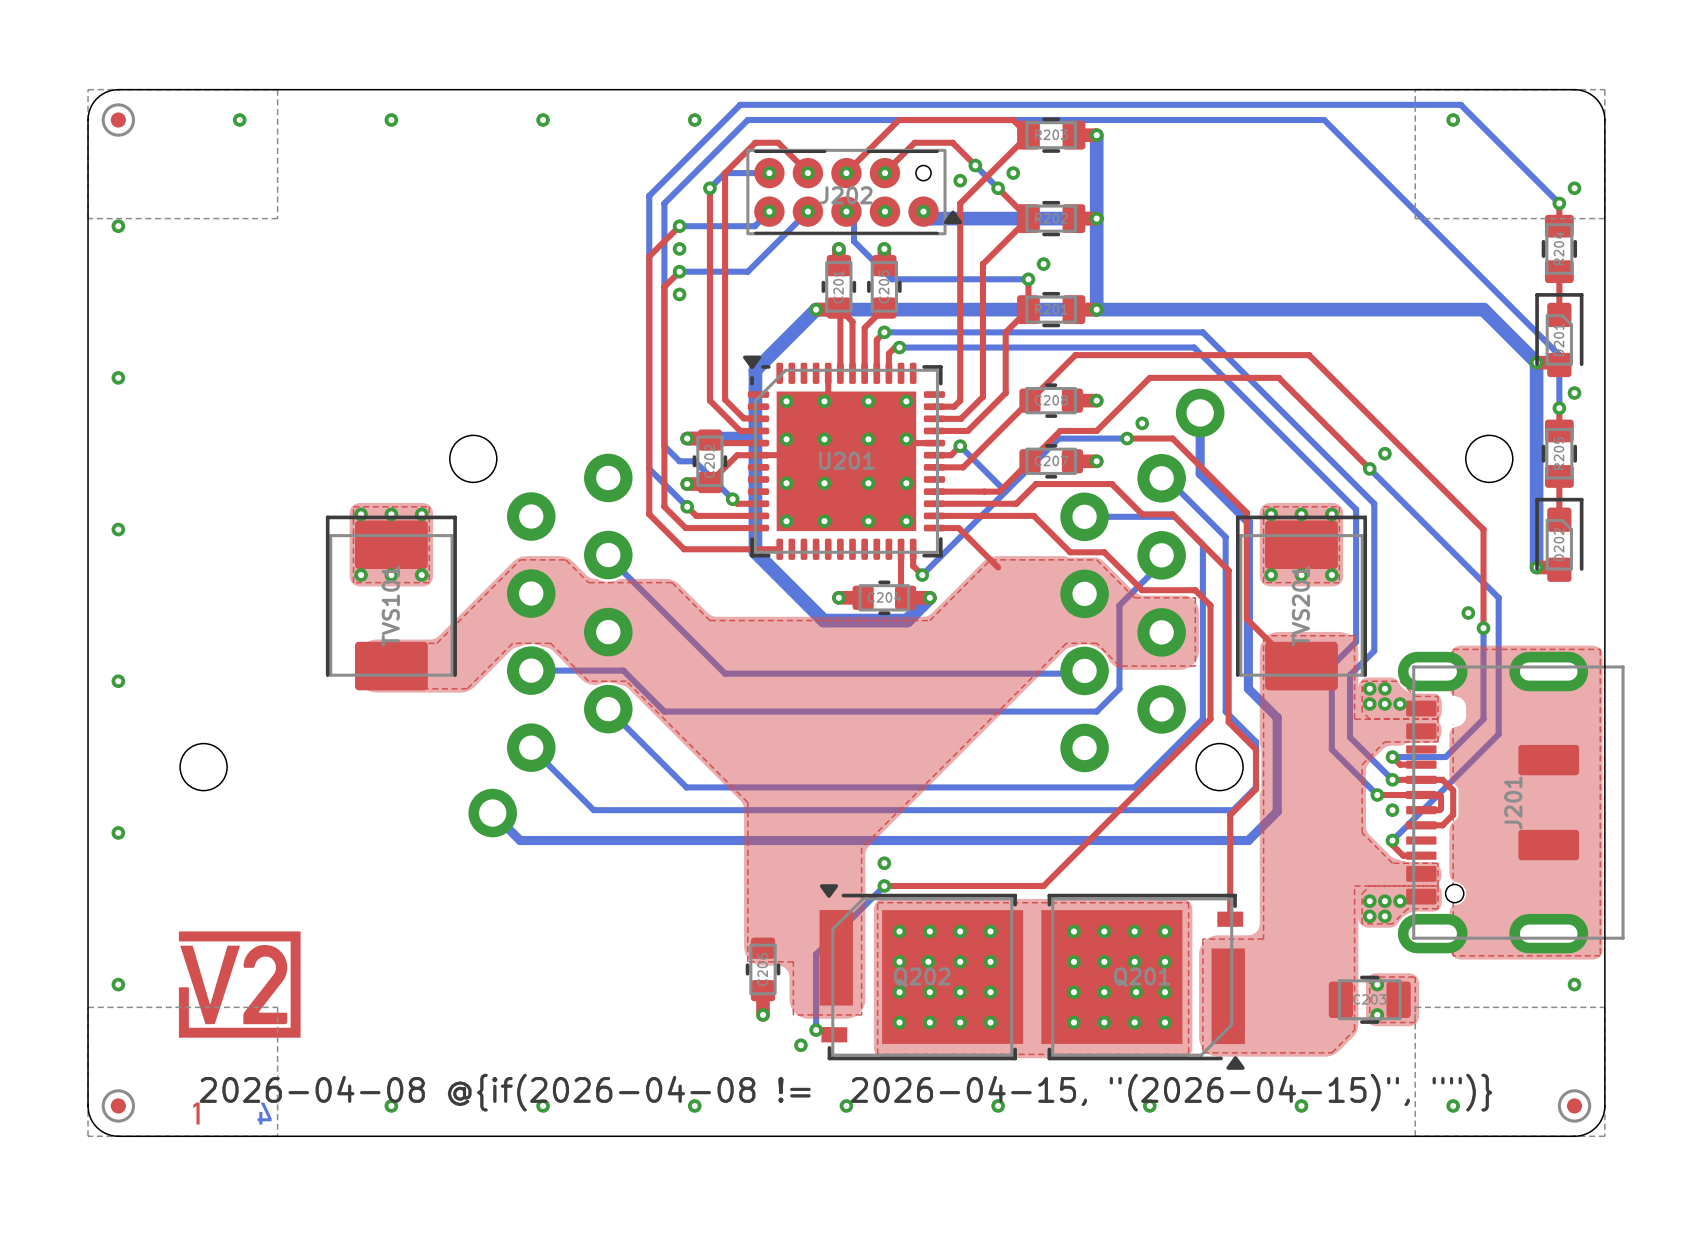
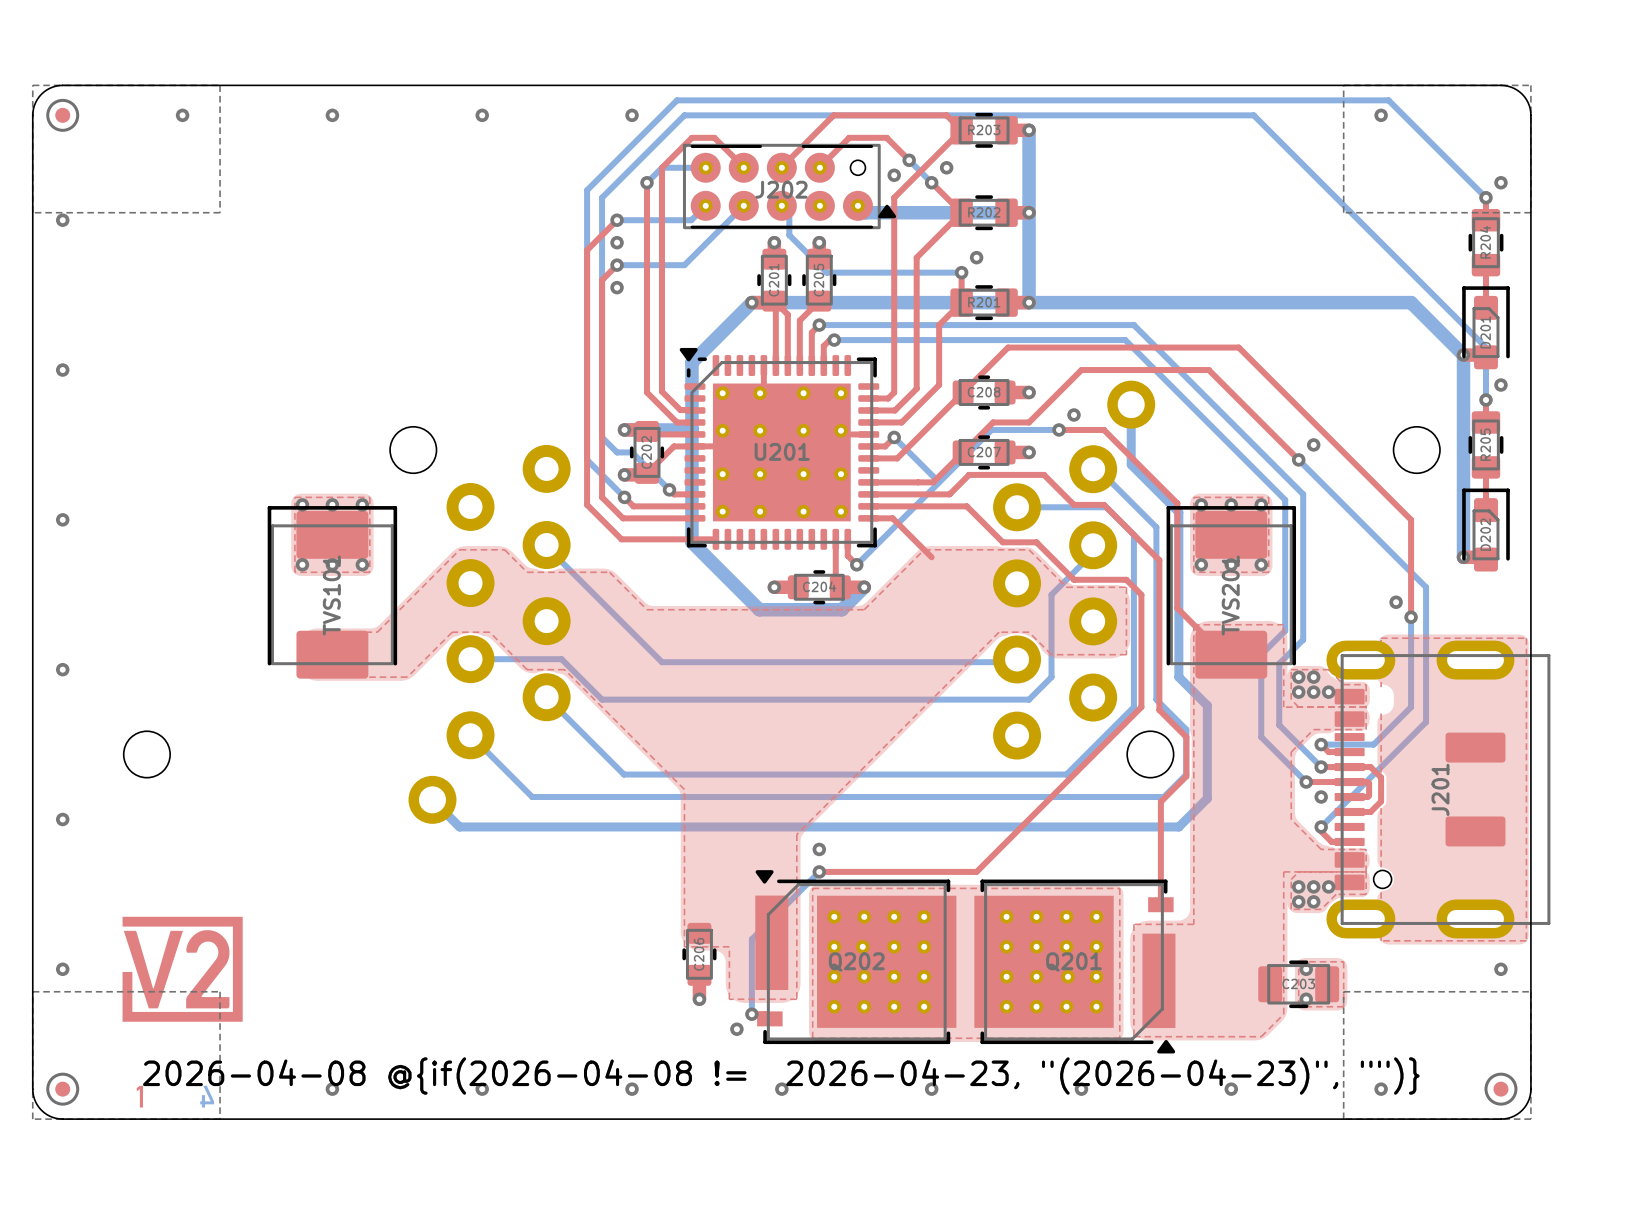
drawing shape: [199, 1073, 1493, 1112] -> [143, 1057, 1420, 1095]

